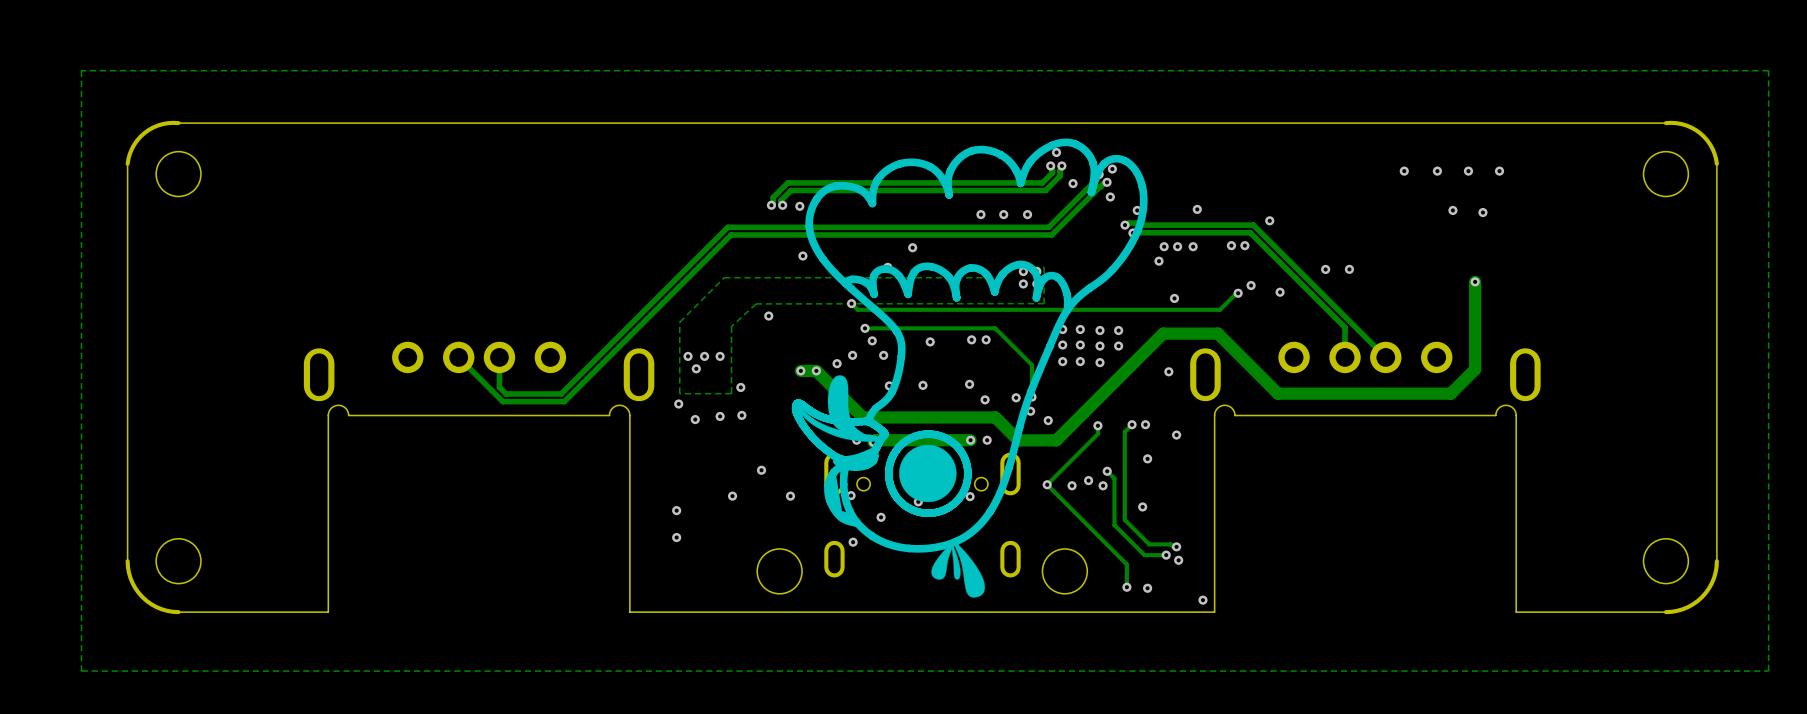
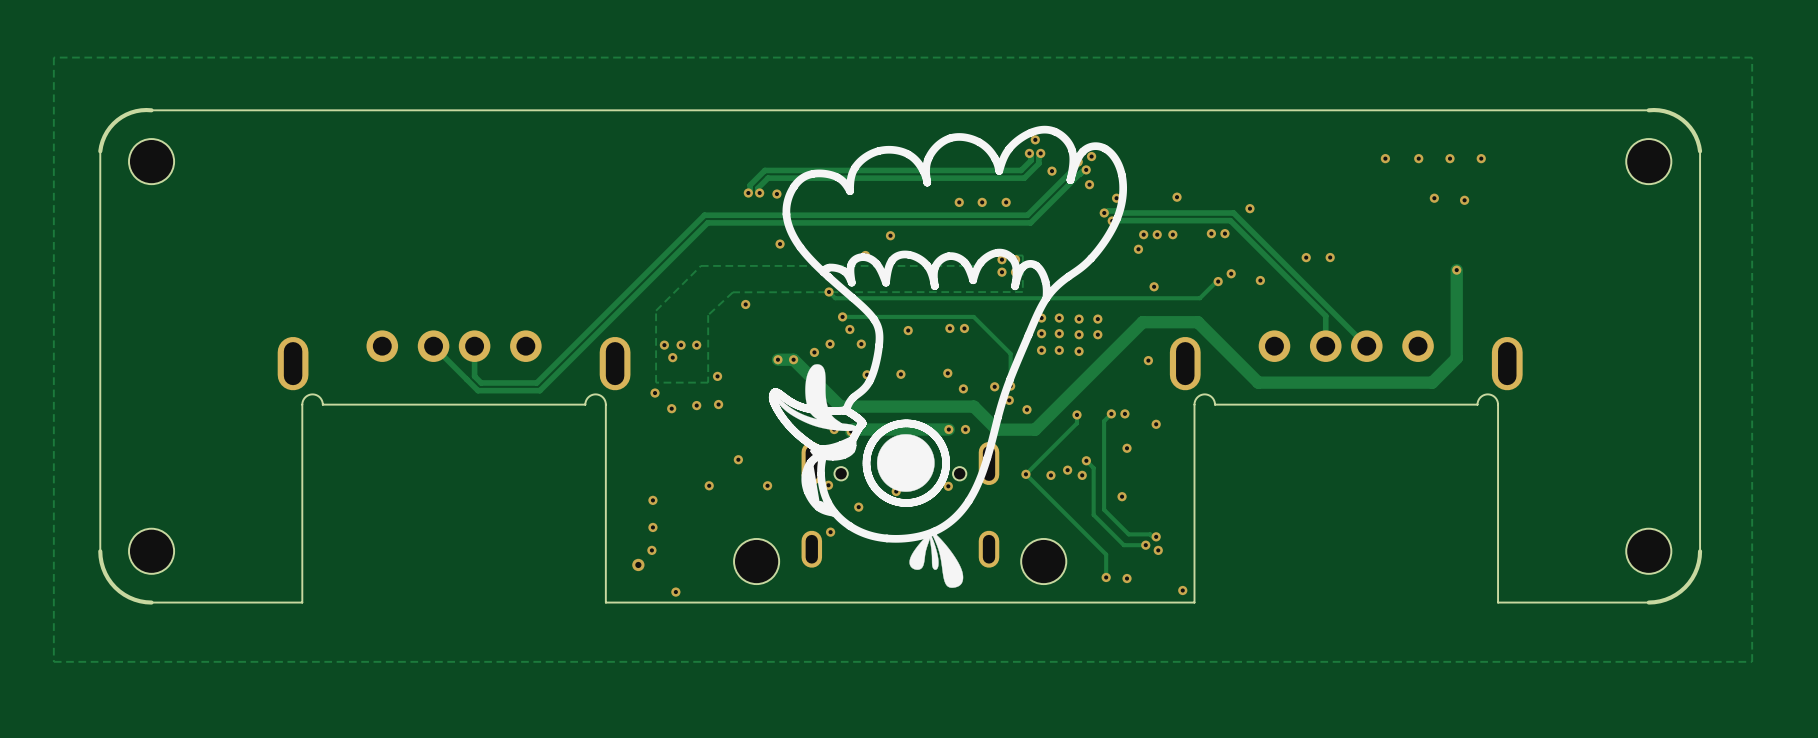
via: none -> (651, 550)
via: none -> (638, 564)
via: none -> (675, 592)

